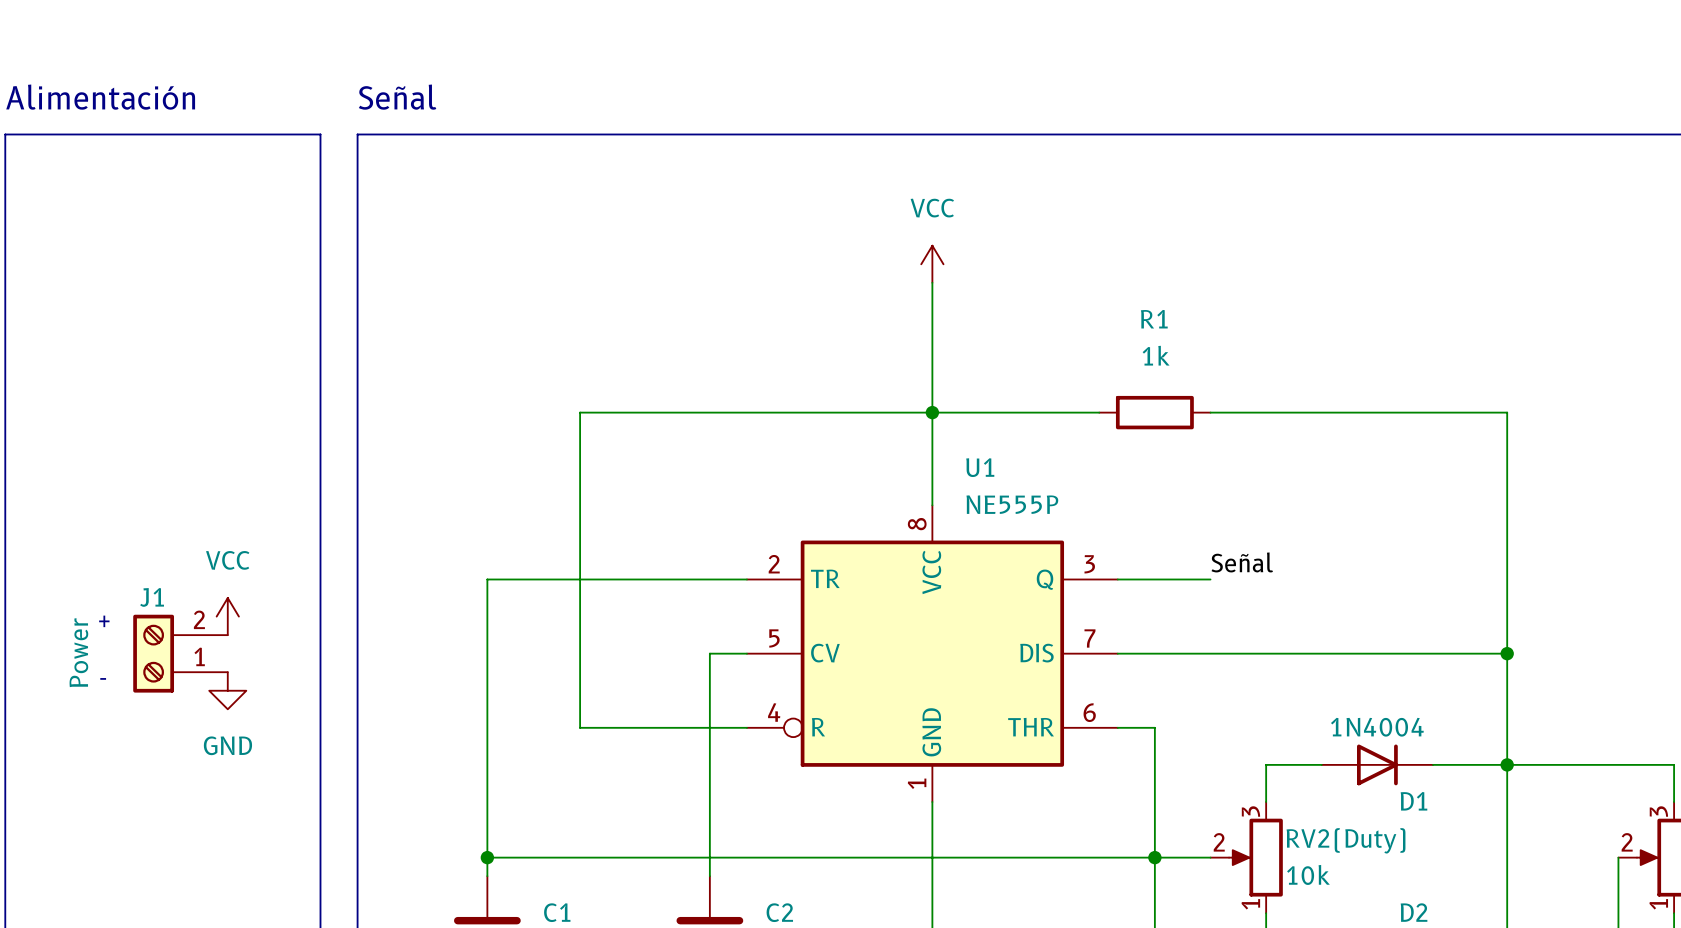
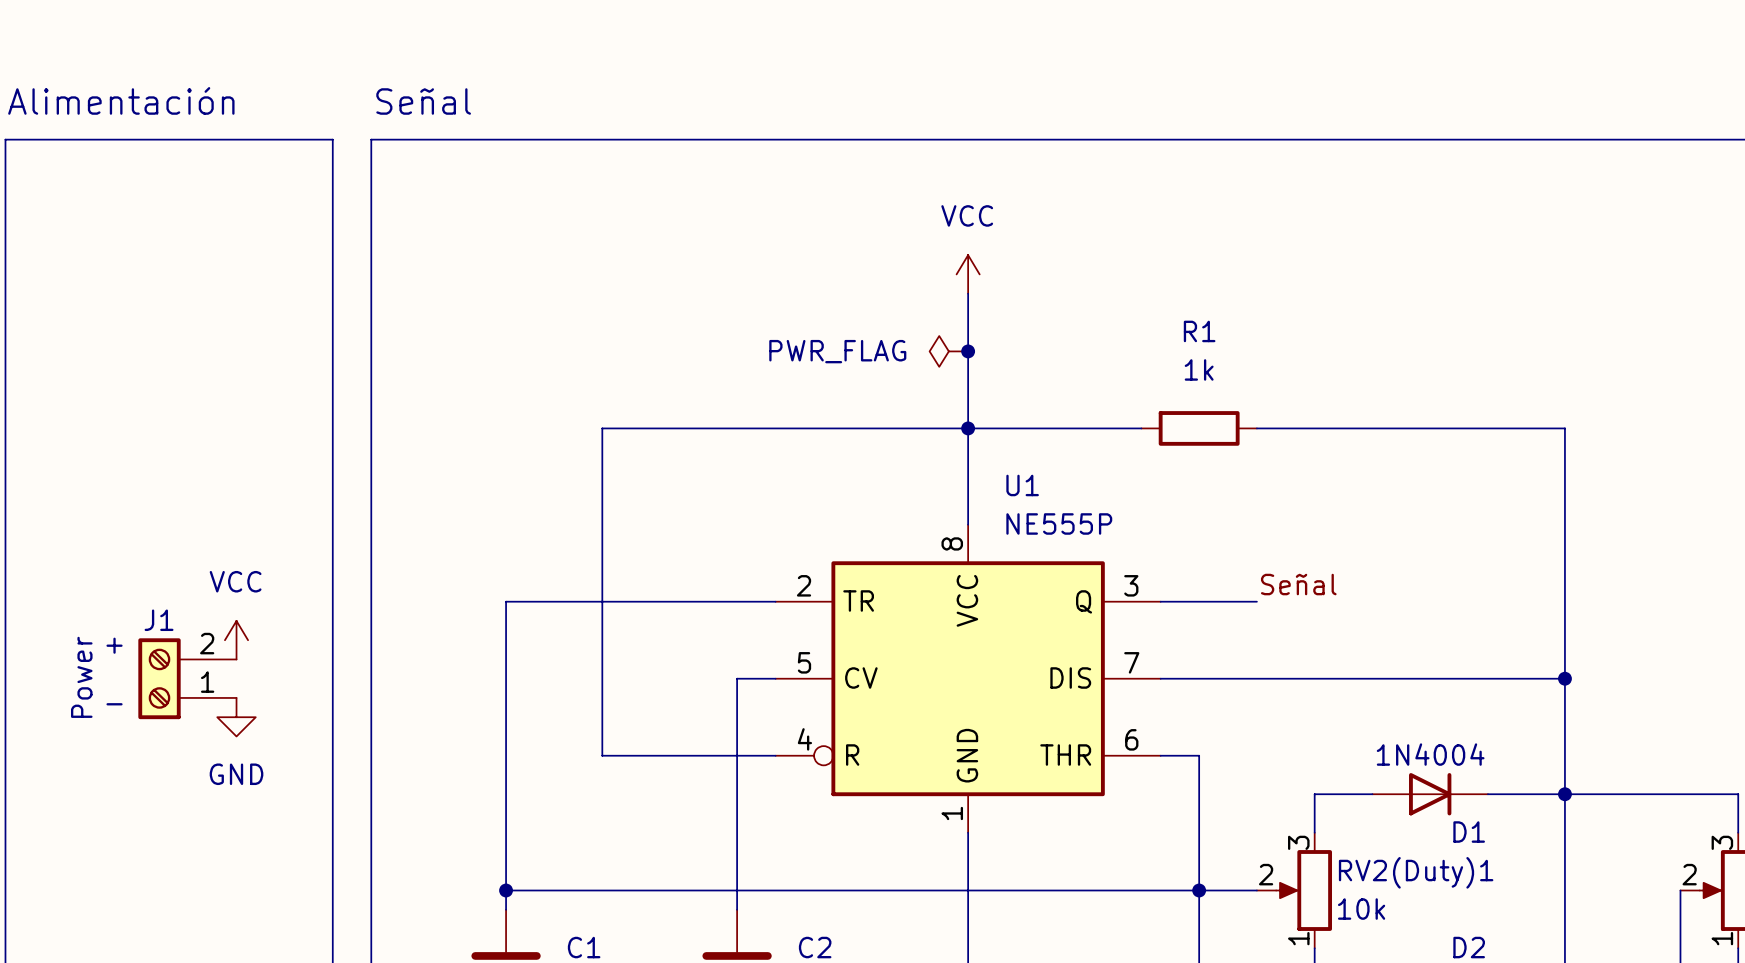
power symbol: none -> PWR_FLAG (948, 351)
junction: none -> (968, 351)
RV2(Duty) name: RV2(Duty) (1346, 840) -> RV2(Duty)1 (1416, 872)

